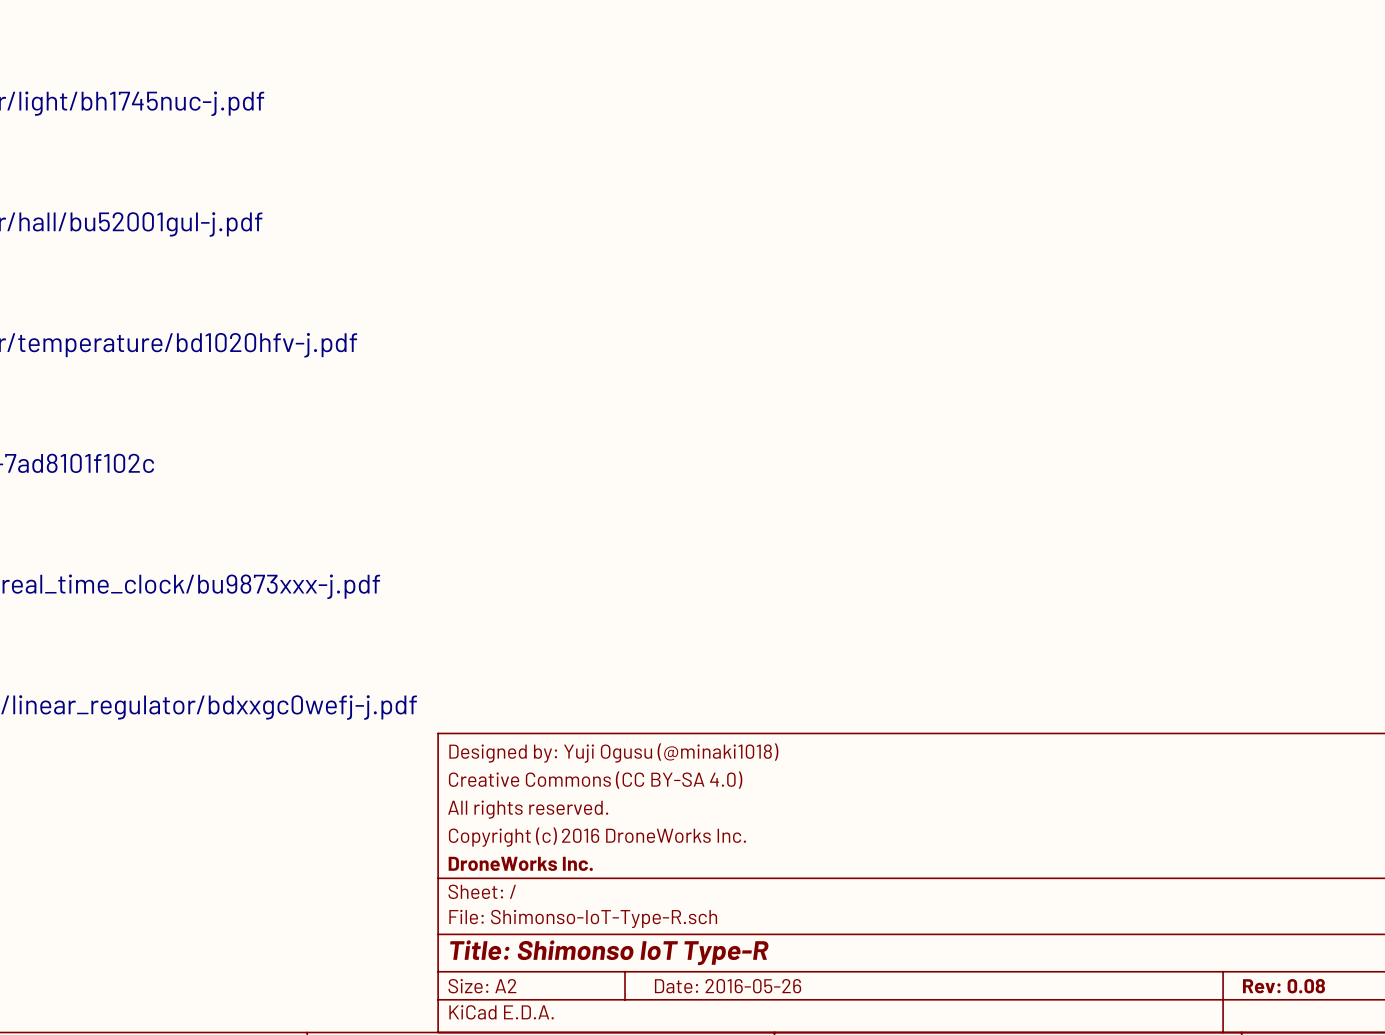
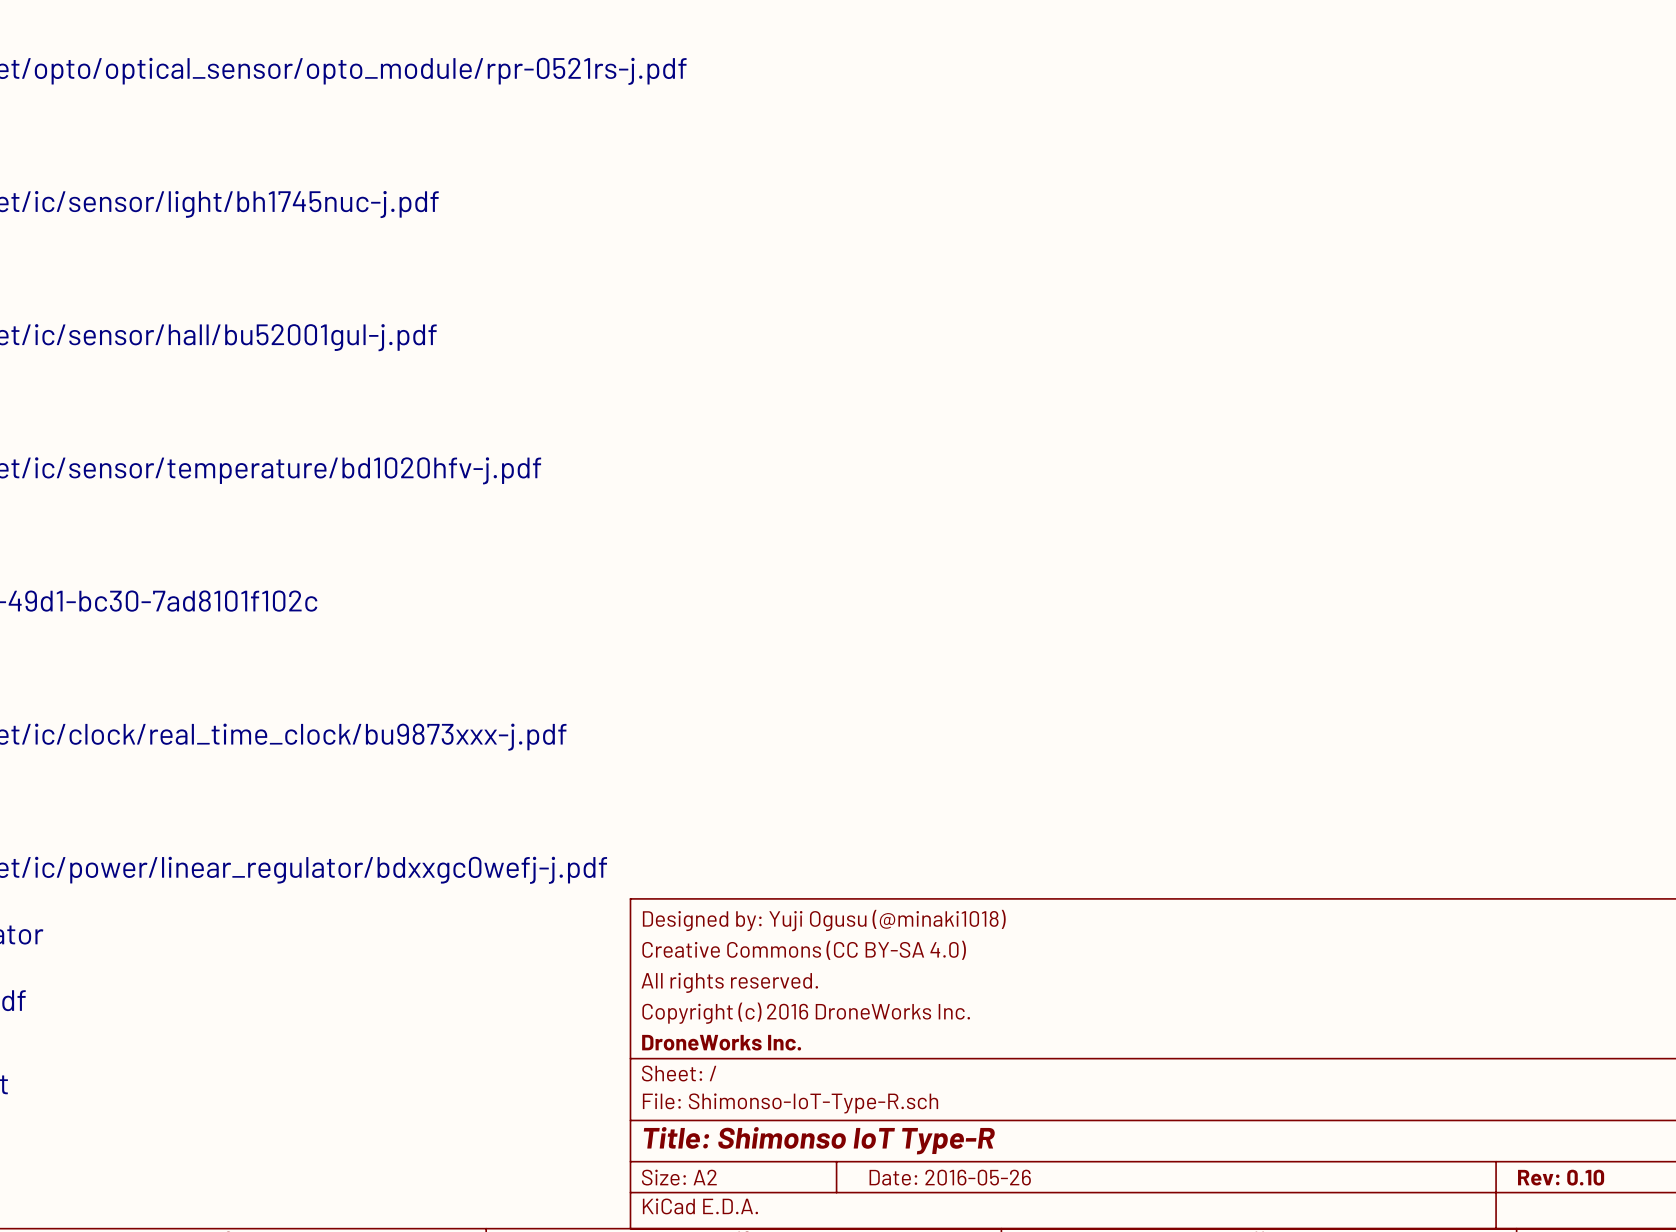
title block: Rev: 0.08 (1283, 986) -> Rev: 0.10 (1561, 1177)

